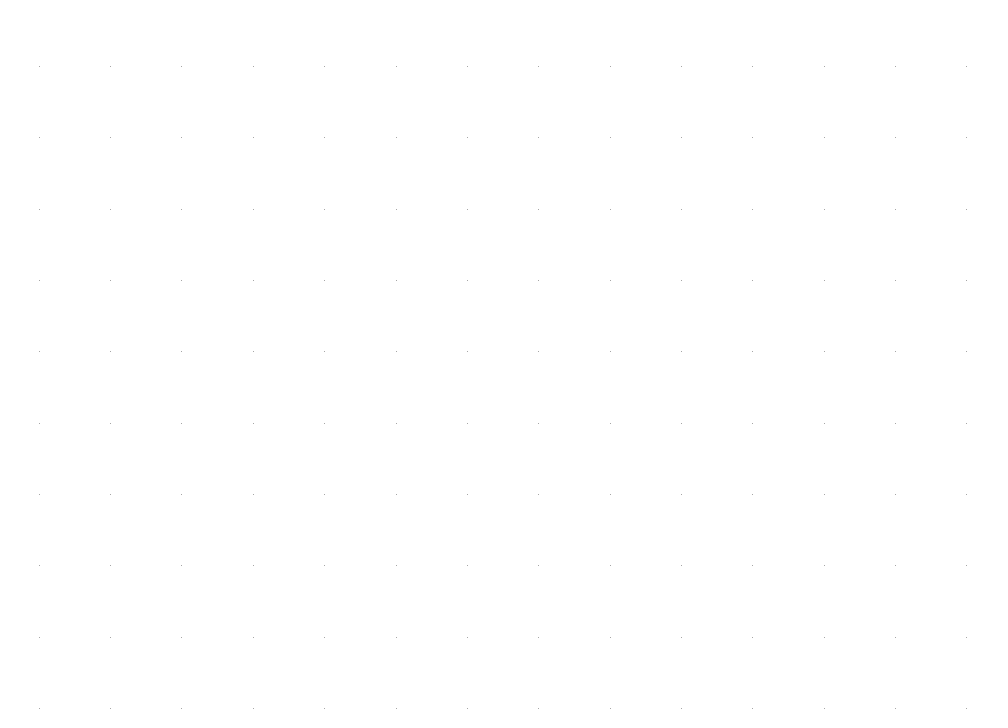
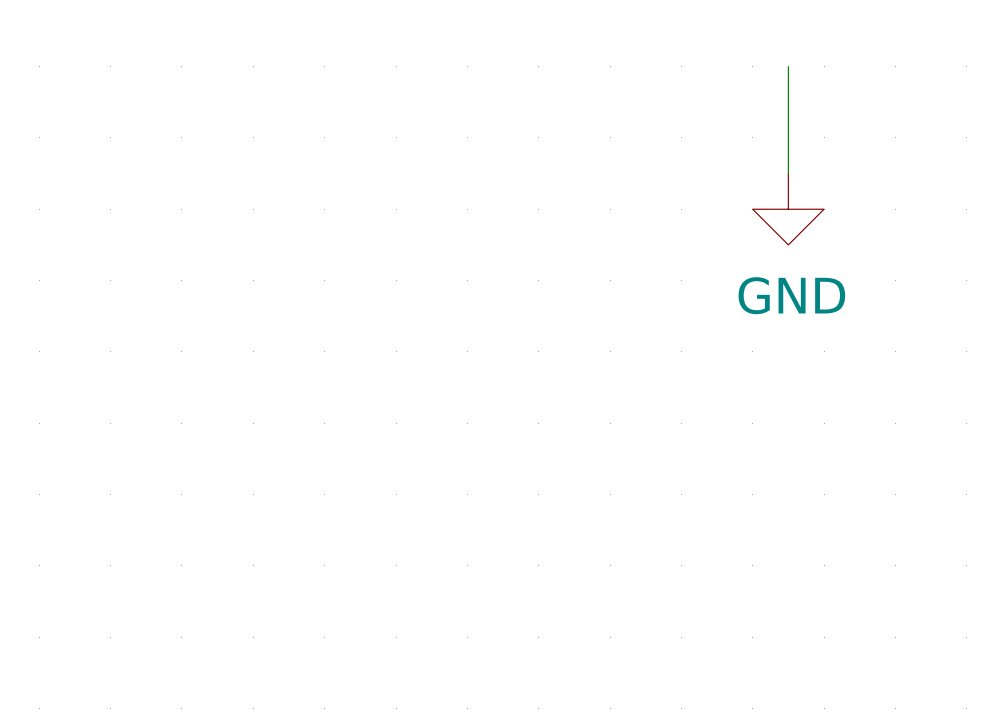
wire: none -> (788, 66) (788, 173)
power symbol: none -> GND (788, 209)

